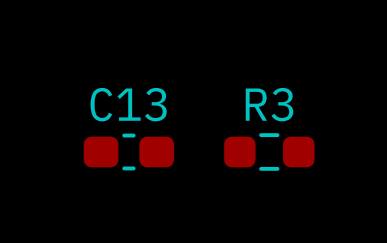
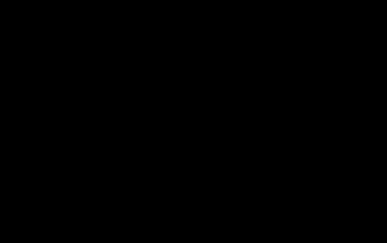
C13: (128, 151) -> none
R3: (269, 151) -> none

